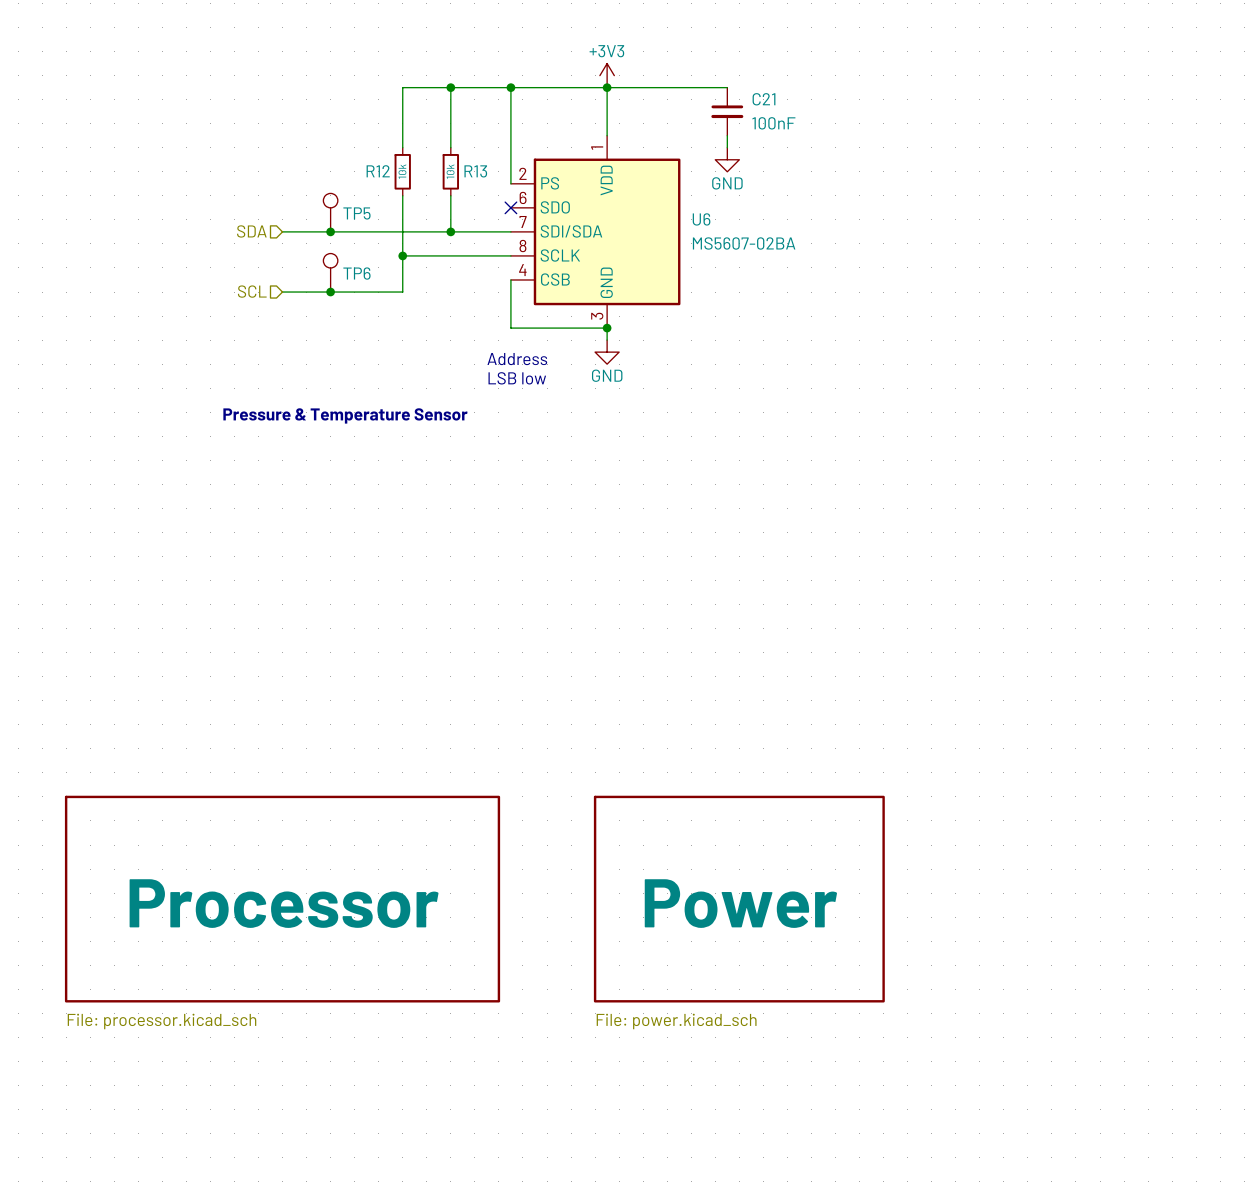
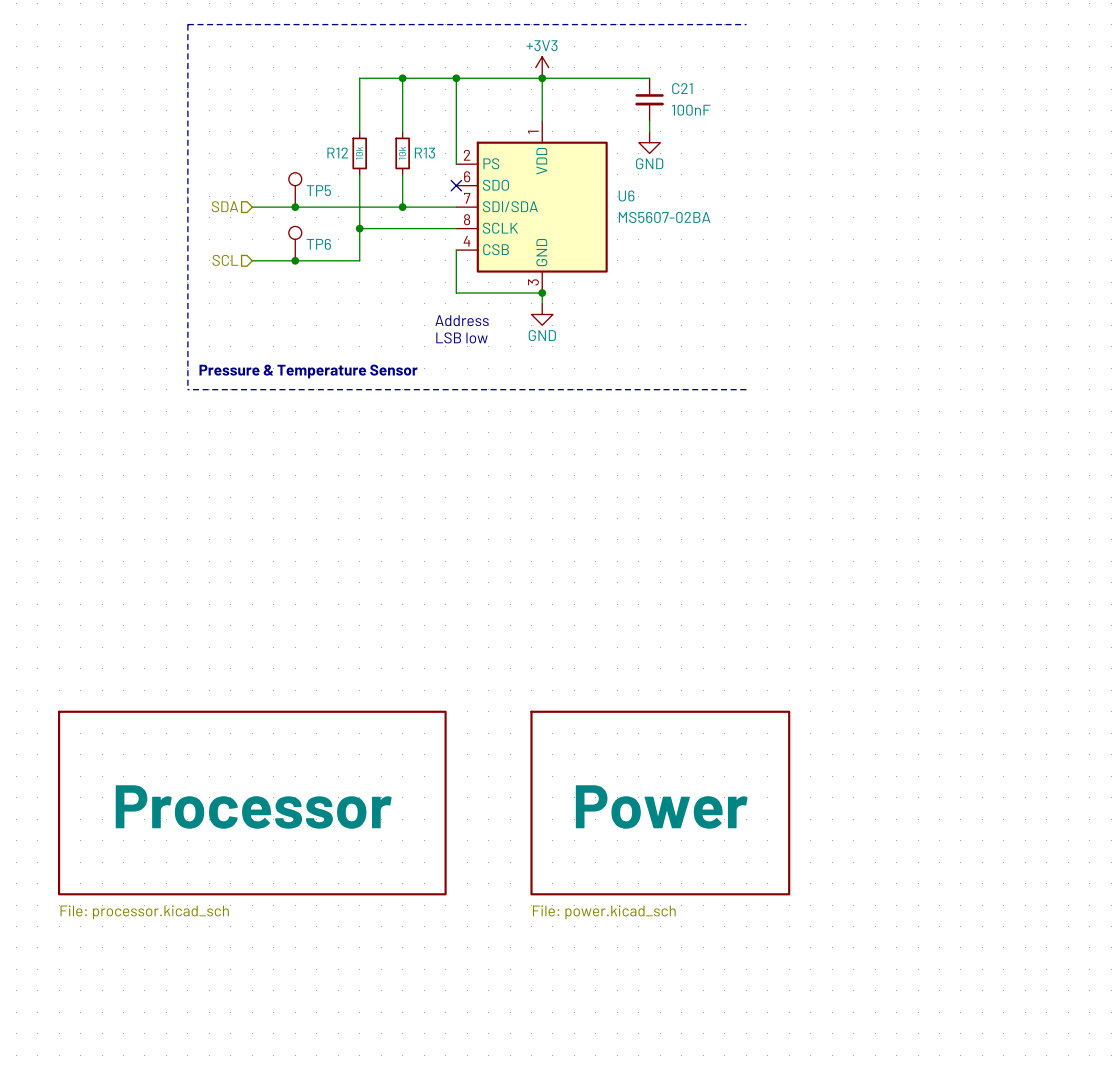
line: none -> (746, 24) (187, 24) (187, 389) (746, 389)

